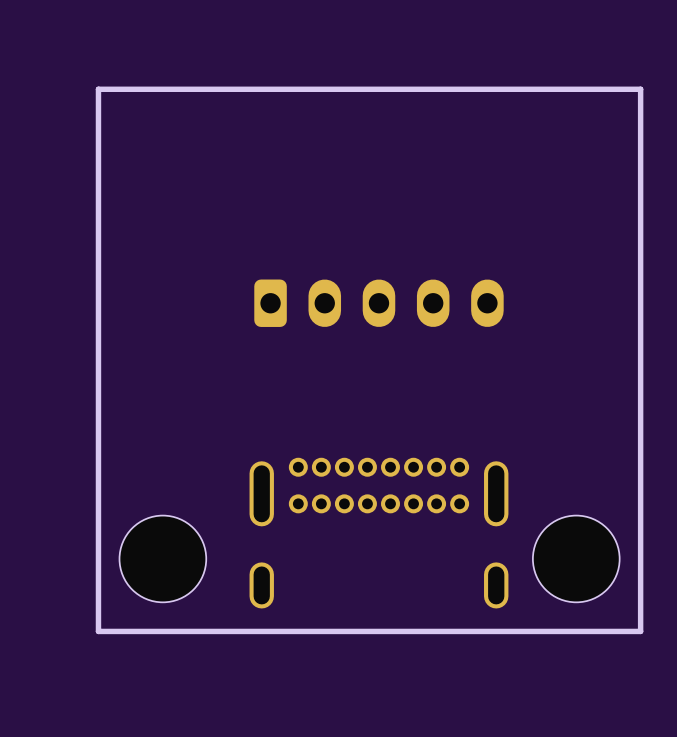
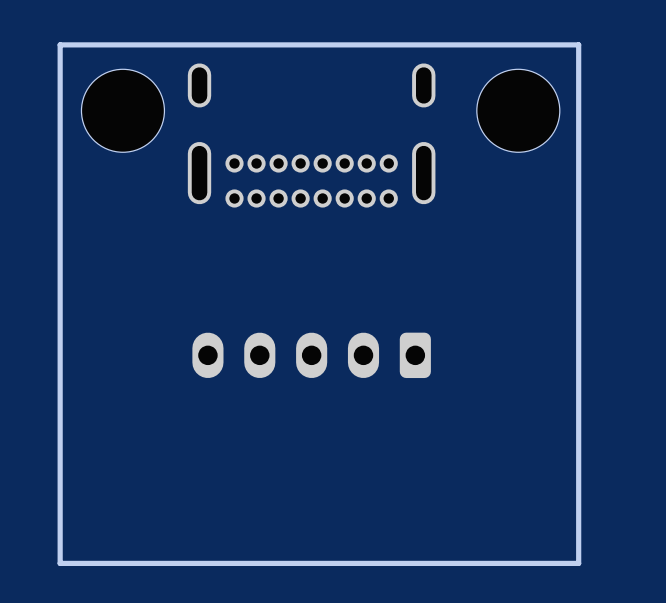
part: none -> (122, 110)
part: none -> (518, 110)
part rotation: 0° (378, 303) -> 180° (311, 355)
part rotation: 0° (378, 533) -> 180° (311, 135)
part position: (378, 533) -> (311, 135)
part: (162, 558) -> none
part: (576, 558) -> none

